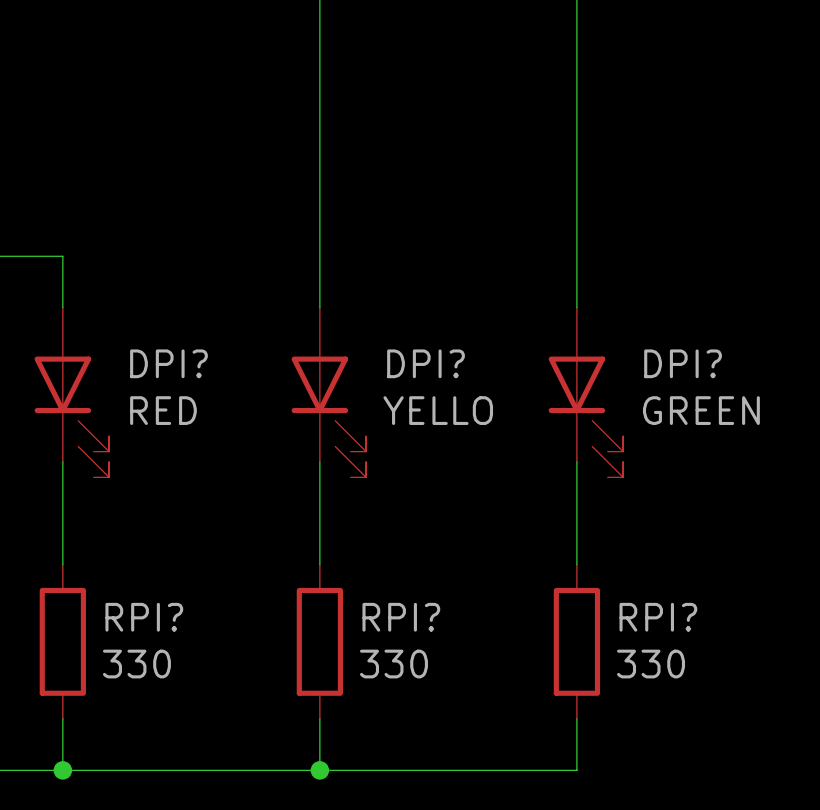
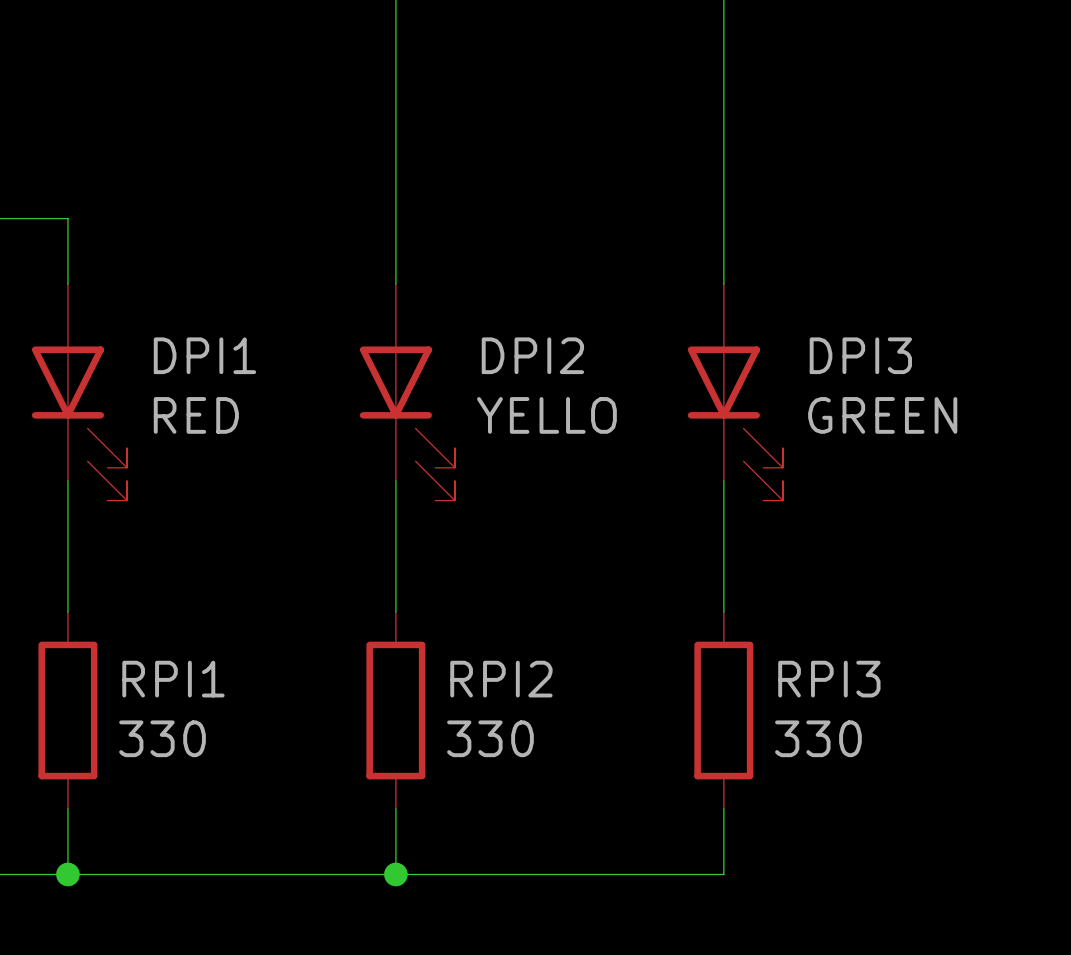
DPI? name: DPI? (168, 363) -> DPI1 (204, 355)
DPI? name: DPI? (426, 363) -> DPI2 (532, 355)
DPI? name: DPI? (683, 363) -> DPI3 (860, 355)
RPI? name: RPI? (144, 617) -> RPI1 (173, 679)
RPI? name: RPI? (401, 617) -> RPI2 (501, 679)
RPI? name: RPI? (658, 617) -> RPI3 (829, 679)

